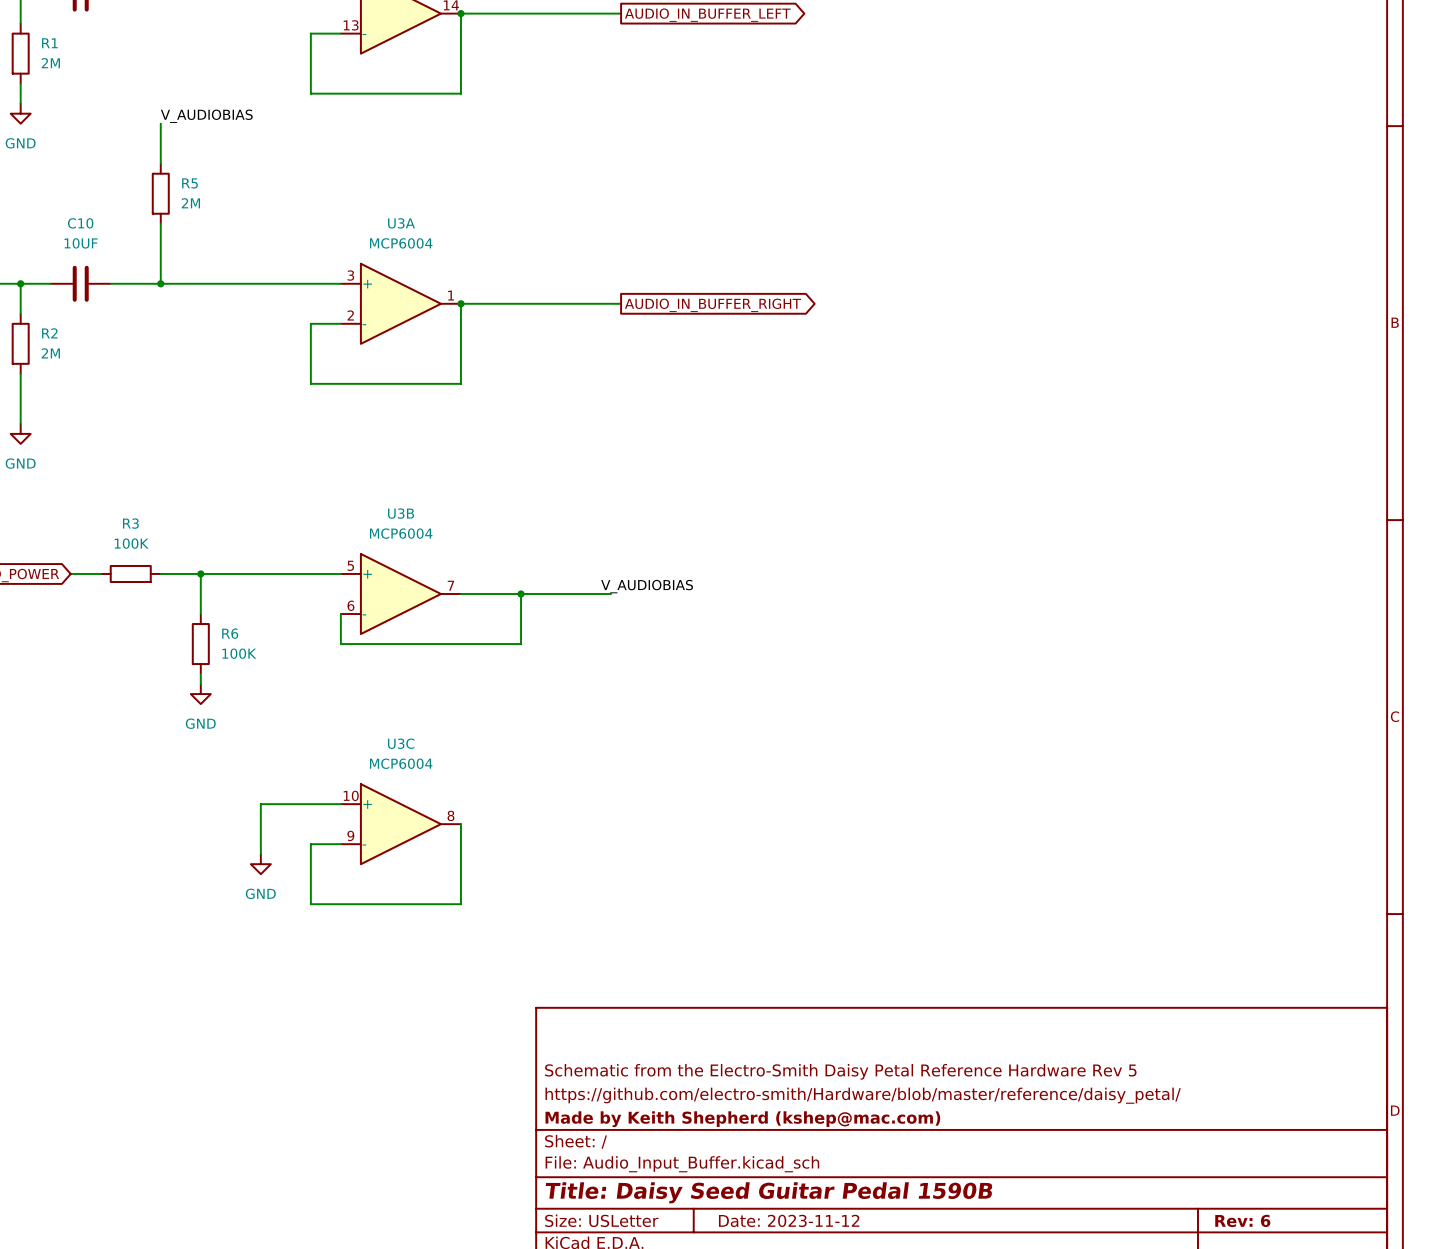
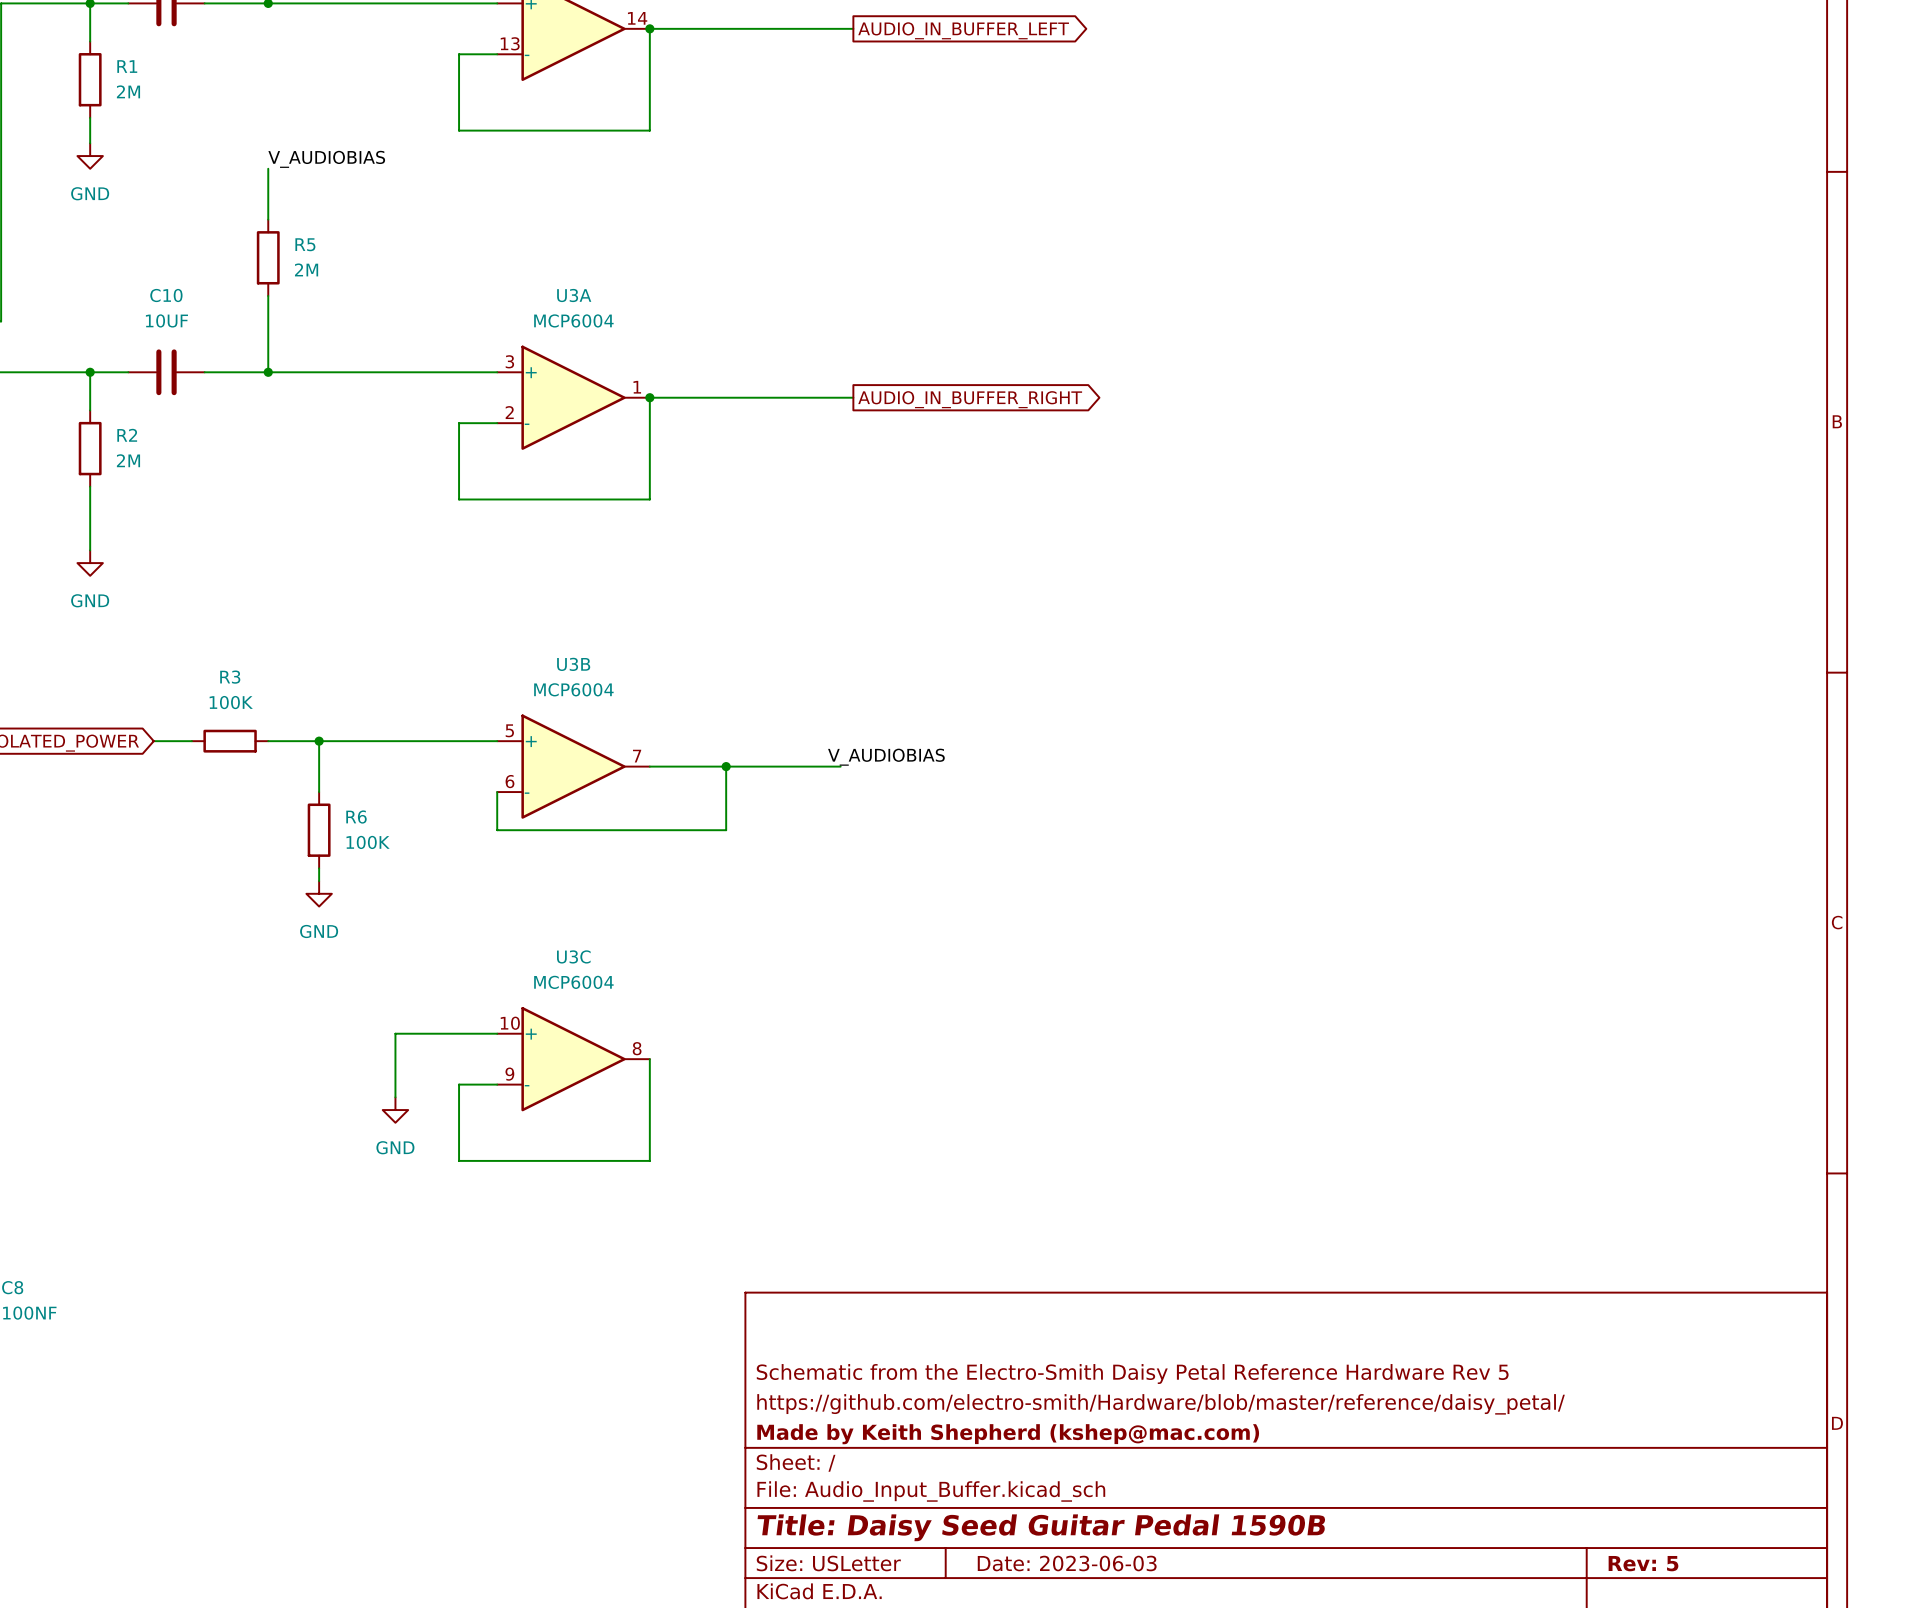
title block: Date: 2023-11-12 (789, 1220) -> Date: 2023-06-03 (1067, 1563)
title block: Rev: 6 (1242, 1220) -> Rev: 5 (1643, 1563)

